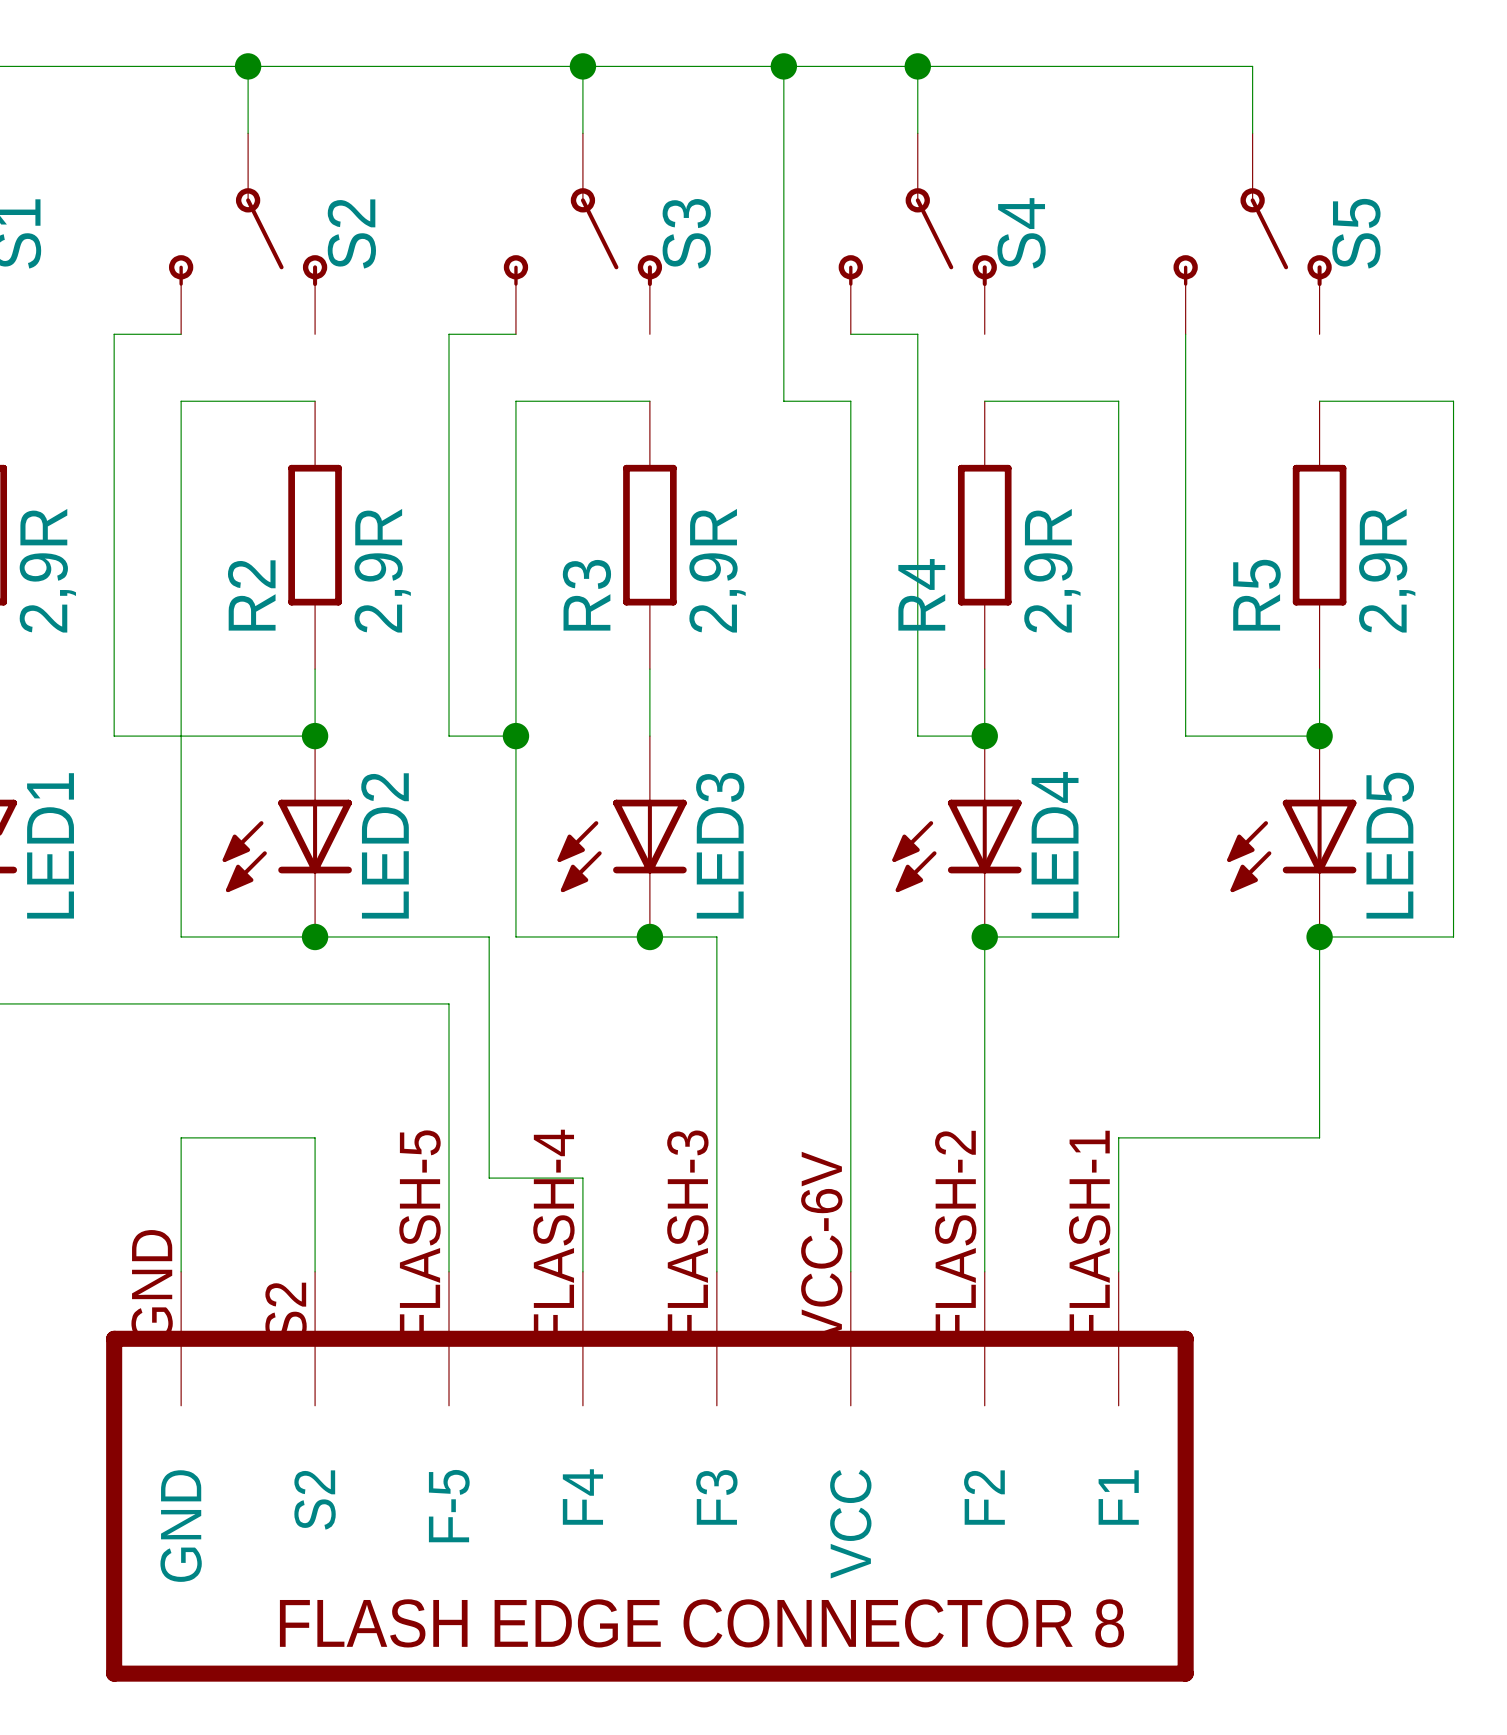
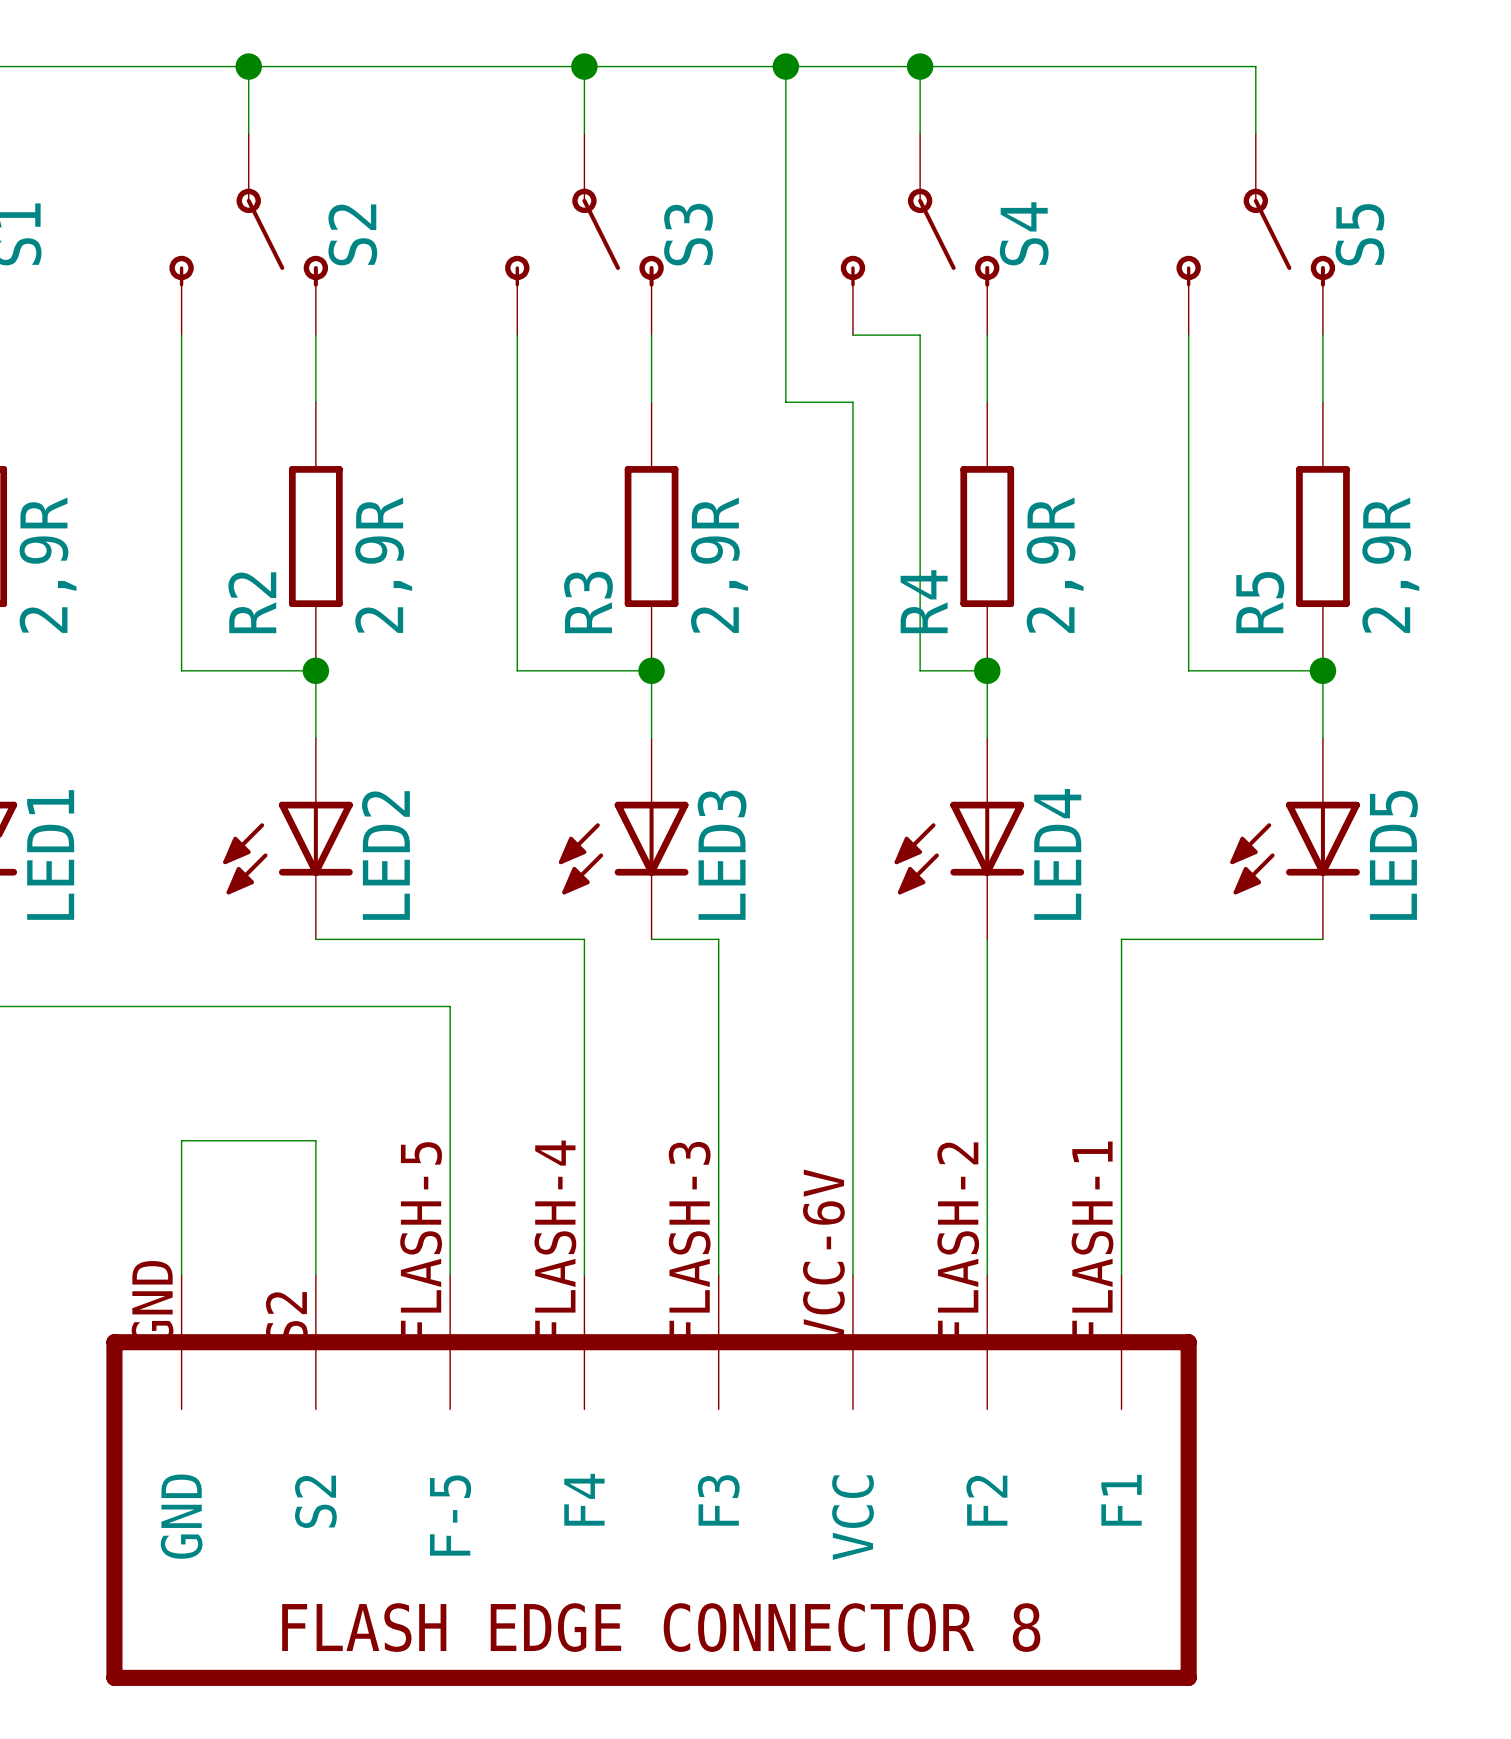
wire: (181, 334) (114, 334) (114, 736) (315, 736) -> none
wire: none -> (315, 335) (315, 402)
wire: (515, 334) (449, 334) (449, 736) (515, 736) -> none
wire: none -> (651, 335) (651, 402)
wire: none -> (1322, 335) (1322, 402)
wire: (181, 401) (315, 401) -> (181, 402) (181, 335)
wire: (515, 401) (649, 401) -> (517, 402) (517, 335)
wire: (984, 401) (1118, 401) (1118, 936) (984, 936) -> (987, 402) (987, 335)
wire: (1319, 401) (1453, 401) (1453, 936) (1319, 936) (1319, 1137) (1118, 1137) -> (1322, 939) (1121, 939) (1121, 1140)
wire: (181, 669) (181, 936) (315, 936) -> (181, 670) (315, 670)
wire: (515, 669) (515, 936) -> (490, 939) (517, 939)
wire: none -> (517, 670) (651, 670)
junction: none -> (651, 670)
wire: (917, 669) (917, 736) (984, 736) -> (920, 670) (987, 670)
wire: (1185, 669) (1185, 736) (1319, 736) -> (1188, 670) (1322, 670)
junction position: (315, 736) -> (315, 670)
junction: (515, 736) -> none
junction position: (984, 736) -> (987, 670)
junction position: (1319, 736) -> (1322, 670)
junction: (315, 936) -> none
wire: (489, 936) (489, 1178) (582, 1178) -> (584, 939) (584, 1181)
wire: (582, 936) (649, 936) -> none
junction: (649, 936) -> none
junction: (984, 936) -> none
junction: (1319, 936) -> none

